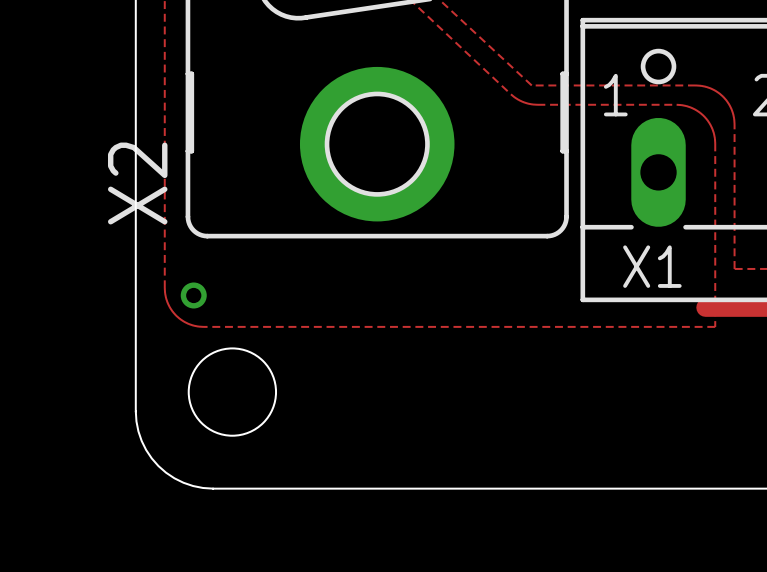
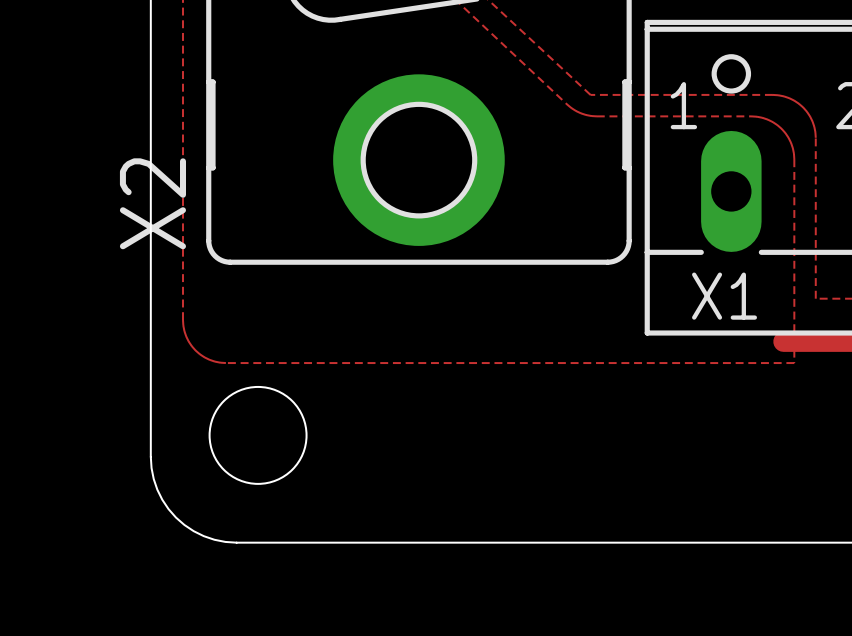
via: (193, 295) -> none

